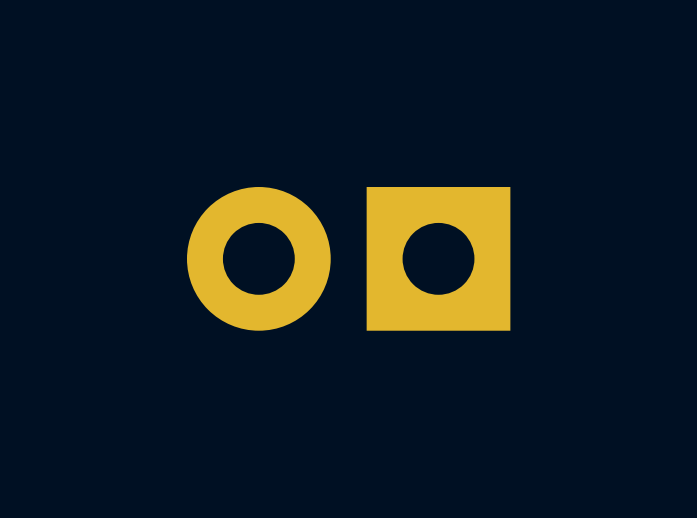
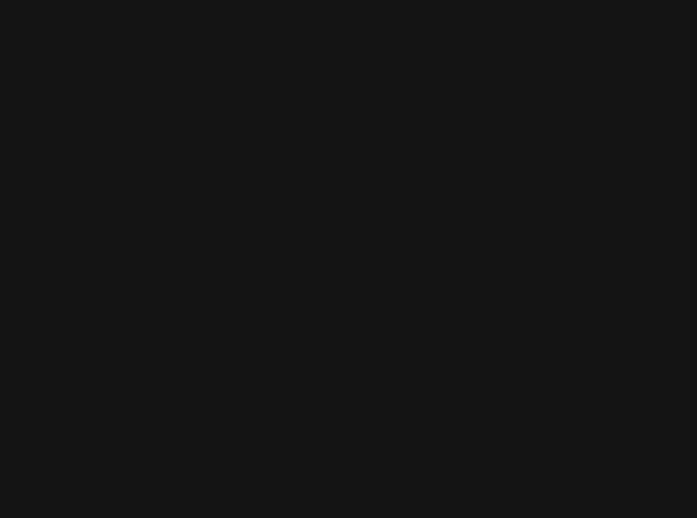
part: (348, 258) -> none

